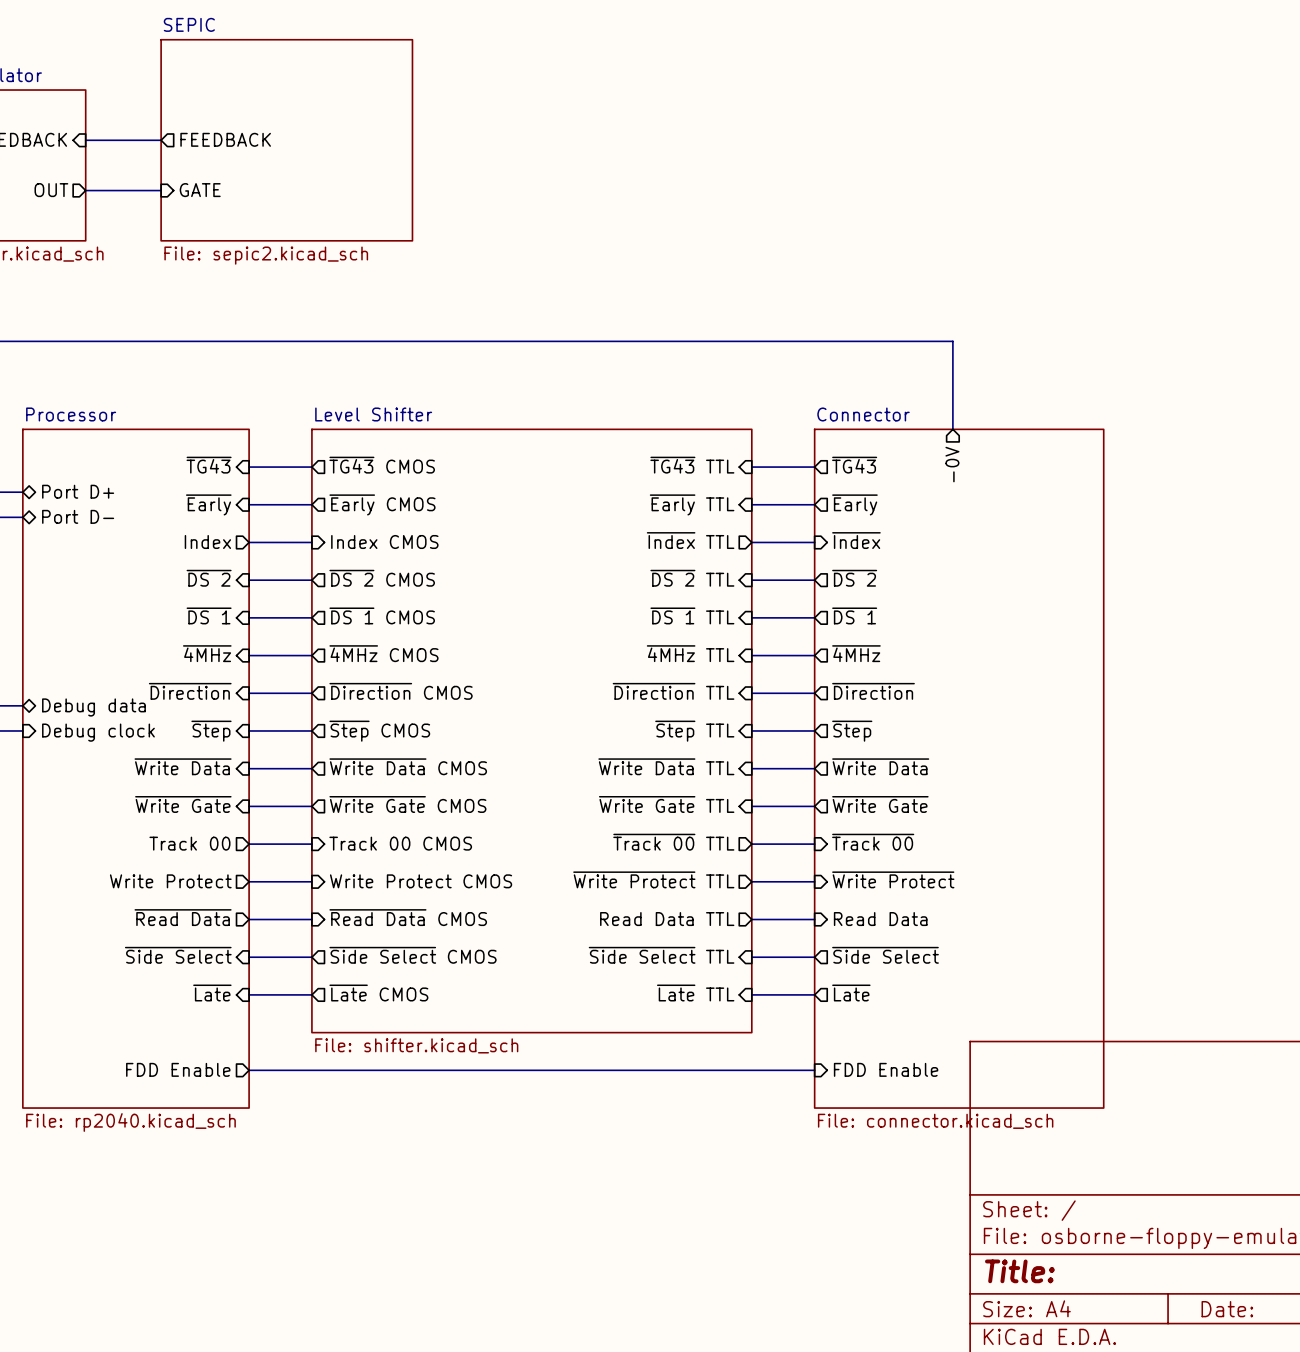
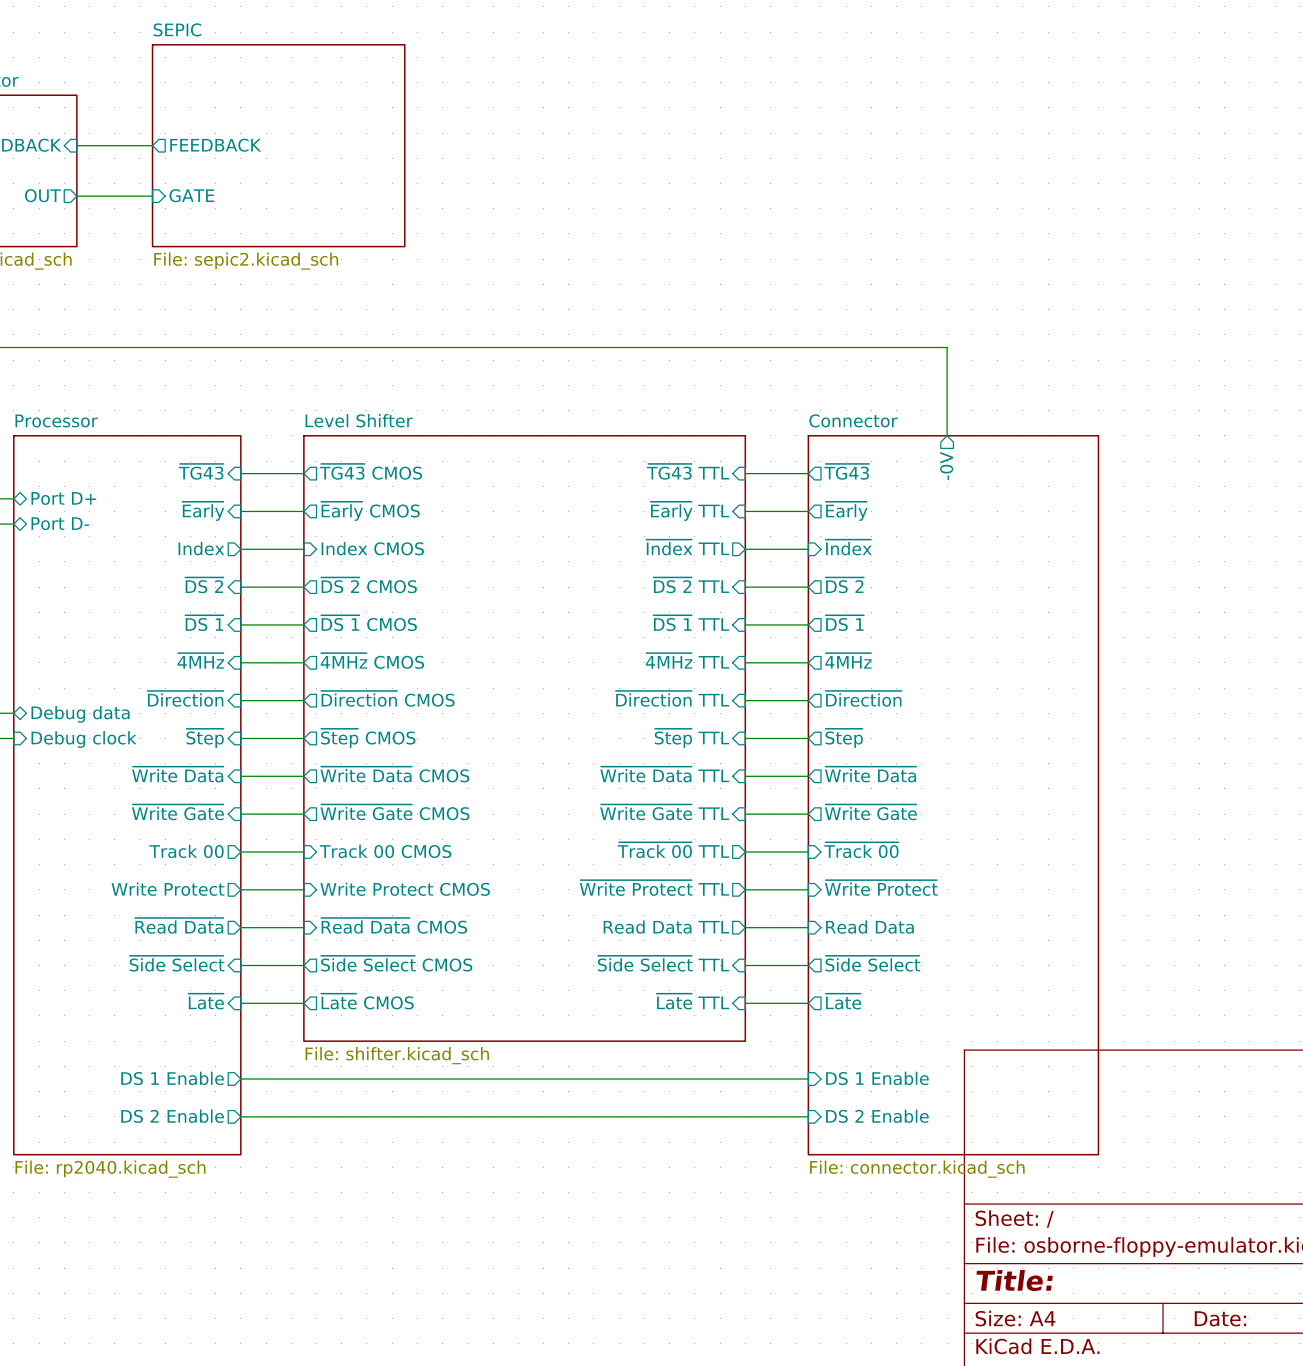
sheet Processor: File: rp2040.kicad_sch (135, 768) -> none
sheet Connector: File: connector.kicad_sch (959, 768) -> none
sheet Processor: none -> File: rp2040.kicad_sch (127, 795)
sheet Connector: none -> File: connector.kicad_sch (953, 795)
sheet pin: FDD Enable (178, 1069) -> DS 1 Enable (172, 1078)
sheet pin: FDD Enable (886, 1069) -> DS 1 Enable (877, 1078)
sheet pin: none -> DS 2 Enable (172, 1116)
sheet pin: none -> DS 2 Enable (877, 1116)
wire: none -> (240, 1116) (808, 1116)

